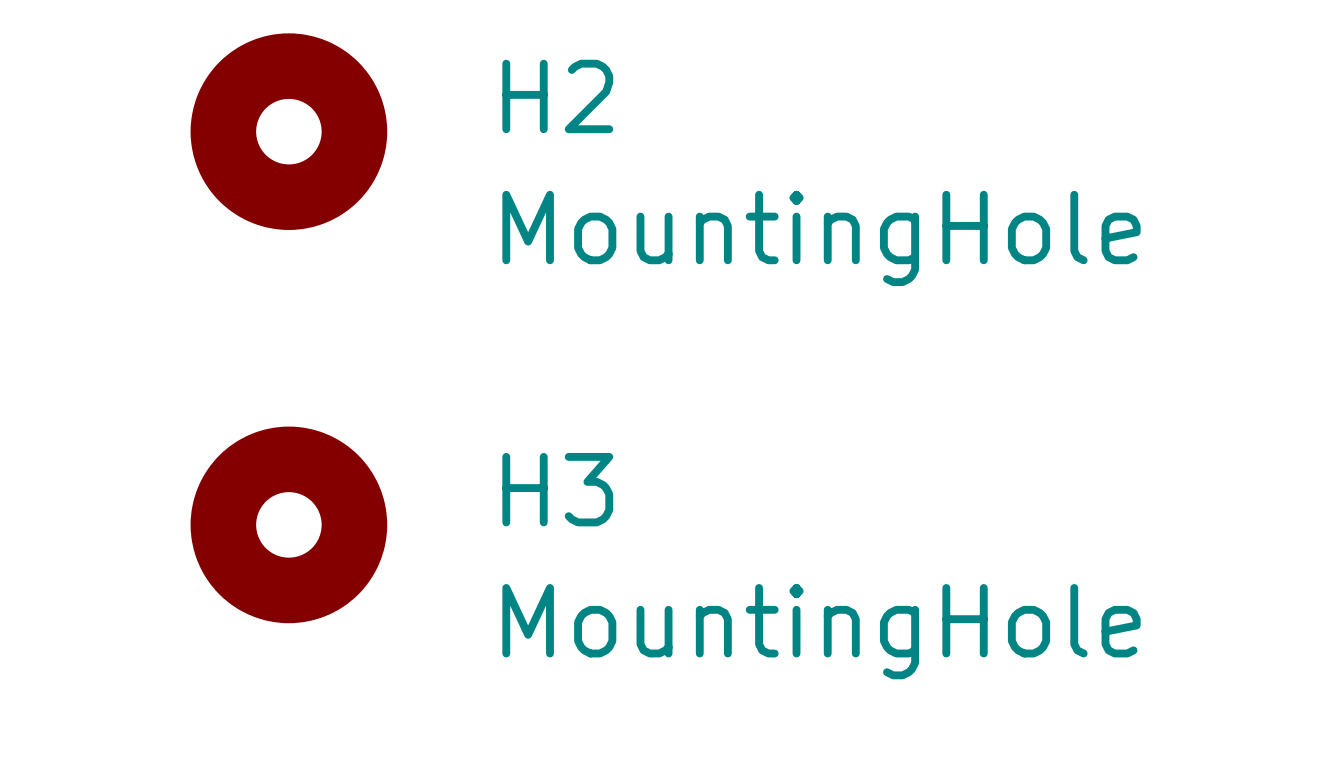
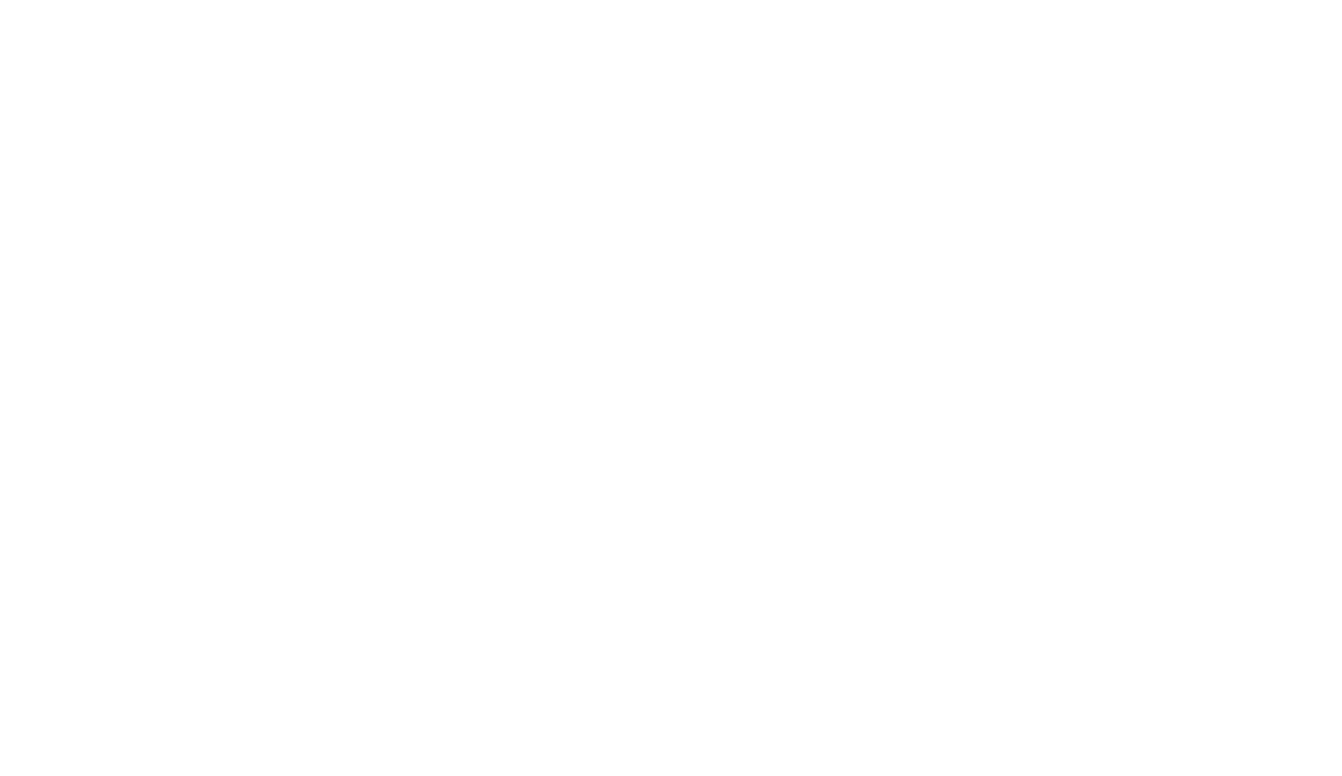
H2: MountingHole (288, 131) -> none
H3: MountingHole (288, 524) -> none

